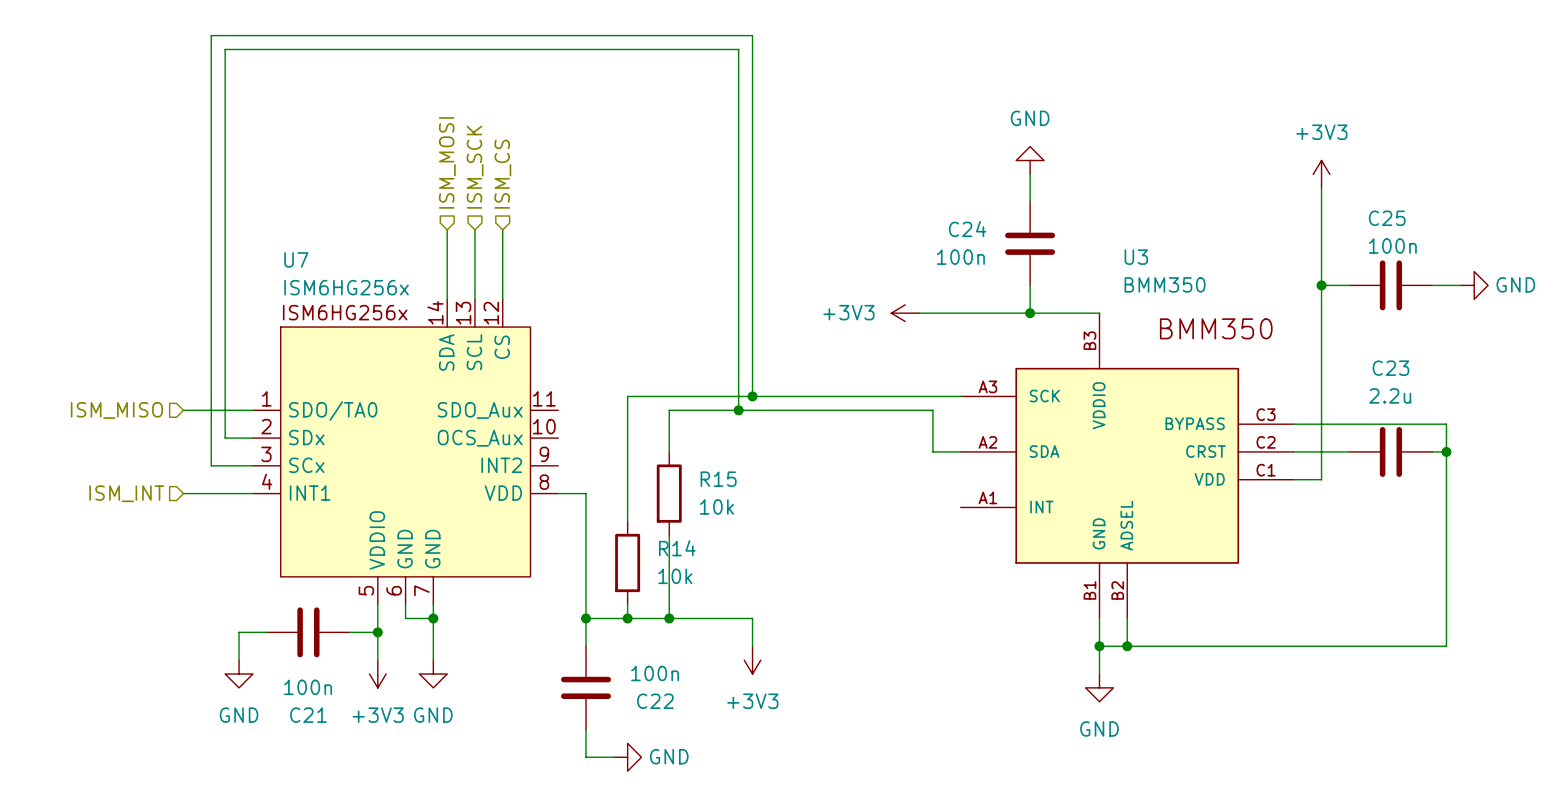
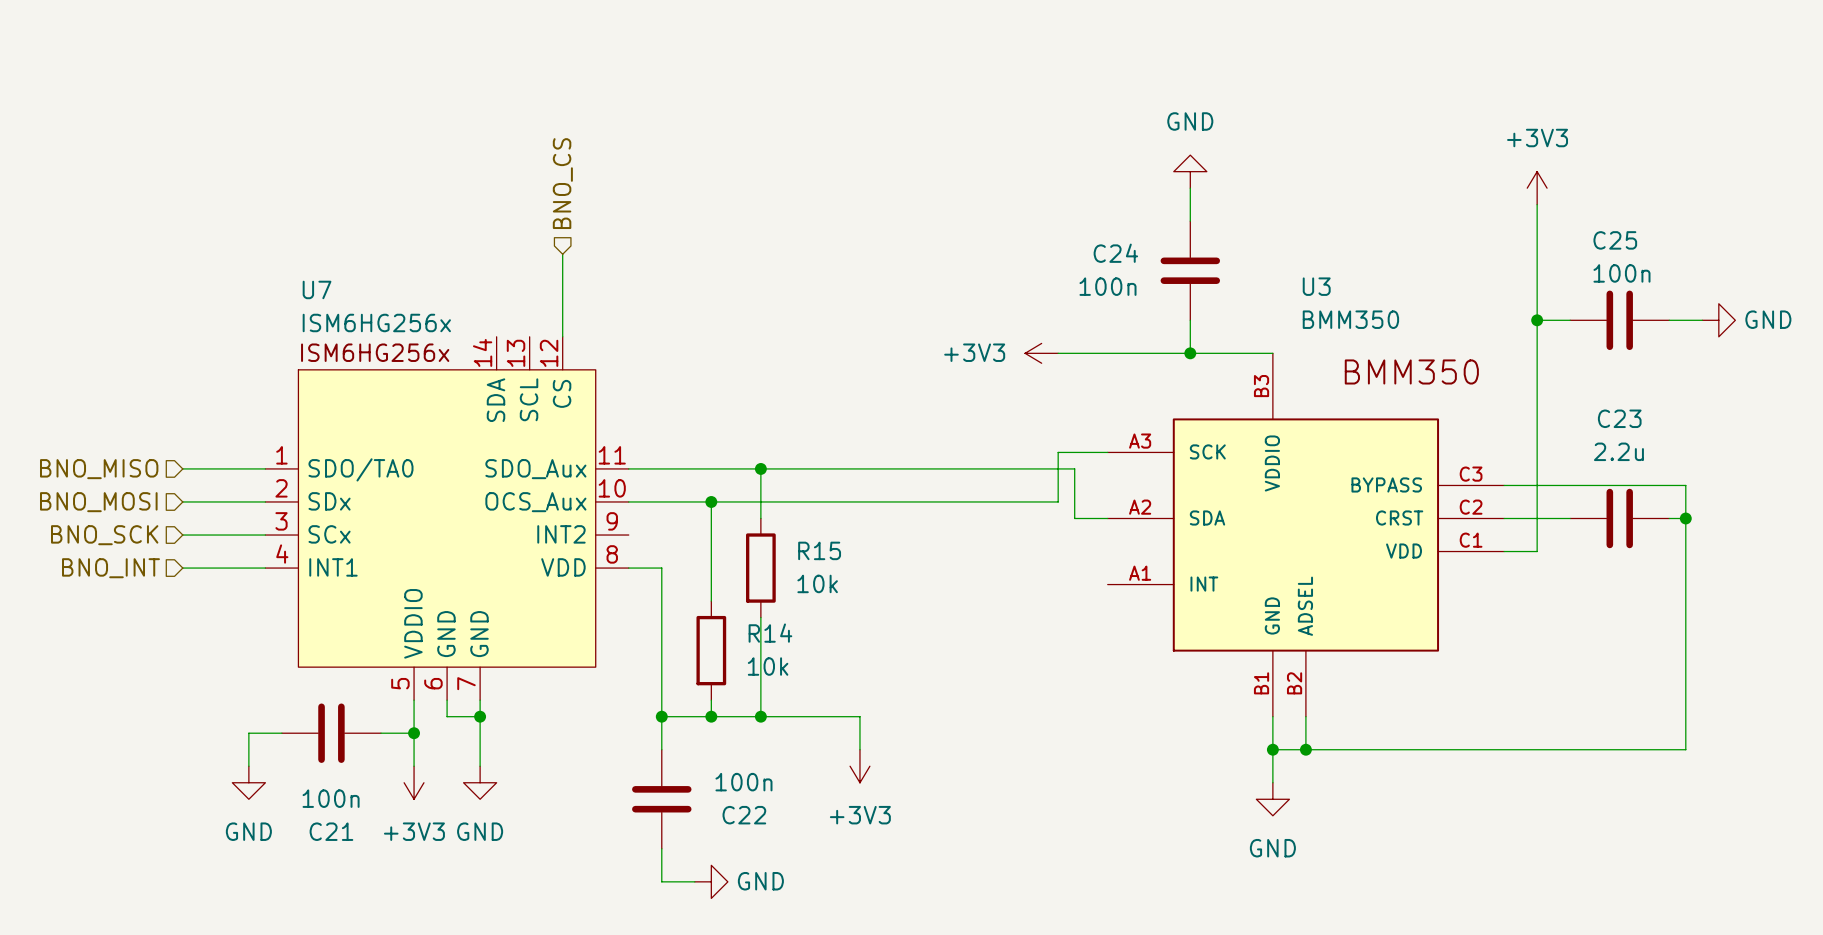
hierarchical label: ISM_MOSI (447, 162) -> none
hierarchical label: ISM_SCK (475, 167) -> none
hierarchical label: ISM_CS (502, 174) -> BNO_CS (562, 183)
wire: (447, 229) (447, 299) -> none
wire: (474, 229) (474, 299) -> none
wire: (752, 396) (752, 35) (211, 35) (211, 465) -> (182, 535) (215, 535)
junction: (752, 396) -> none
wire: (919, 396) (627, 396) (627, 438) -> (1058, 452) (1058, 501) (628, 501)
hierarchical label: ISM_MISO (116, 410) -> BNO_MISO (99, 469)
wire: none -> (628, 468) (760, 468)
junction: none -> (760, 468)
wire: (738, 410) (738, 49) (225, 49) (225, 438) -> (182, 501) (232, 501)
junction: (738, 410) -> none
hierarchical label: none -> BNO_MOSI (98, 502)
junction: none -> (711, 501)
hierarchical label: none -> BNO_SCK (104, 535)
hierarchical label: ISM_INT (126, 493) -> BNO_INT (110, 568)

